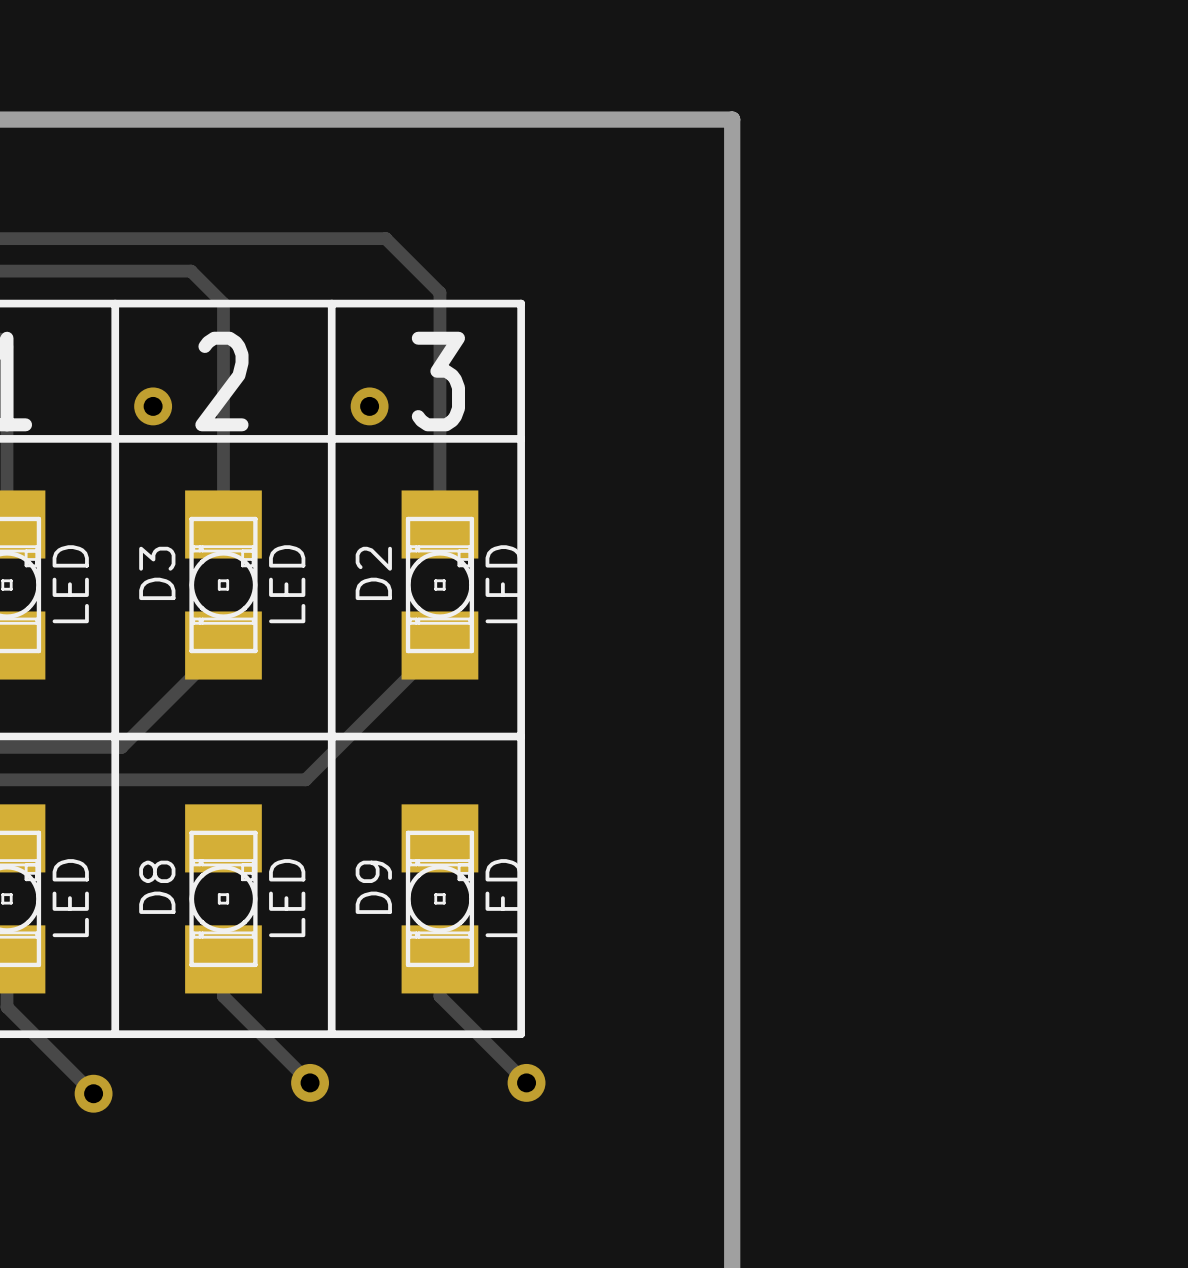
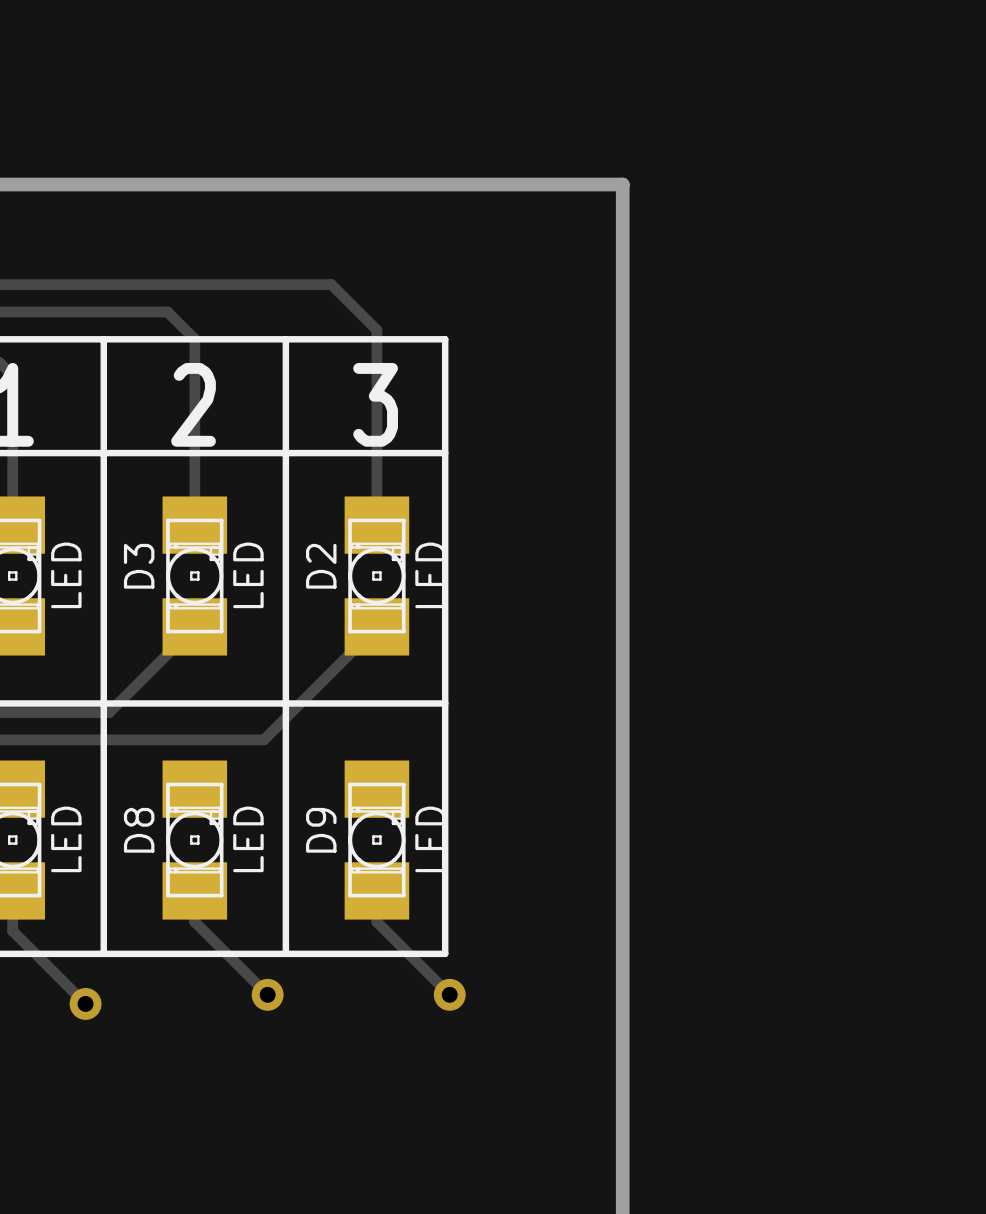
via: (153, 406) -> none
via: (369, 406) -> none

